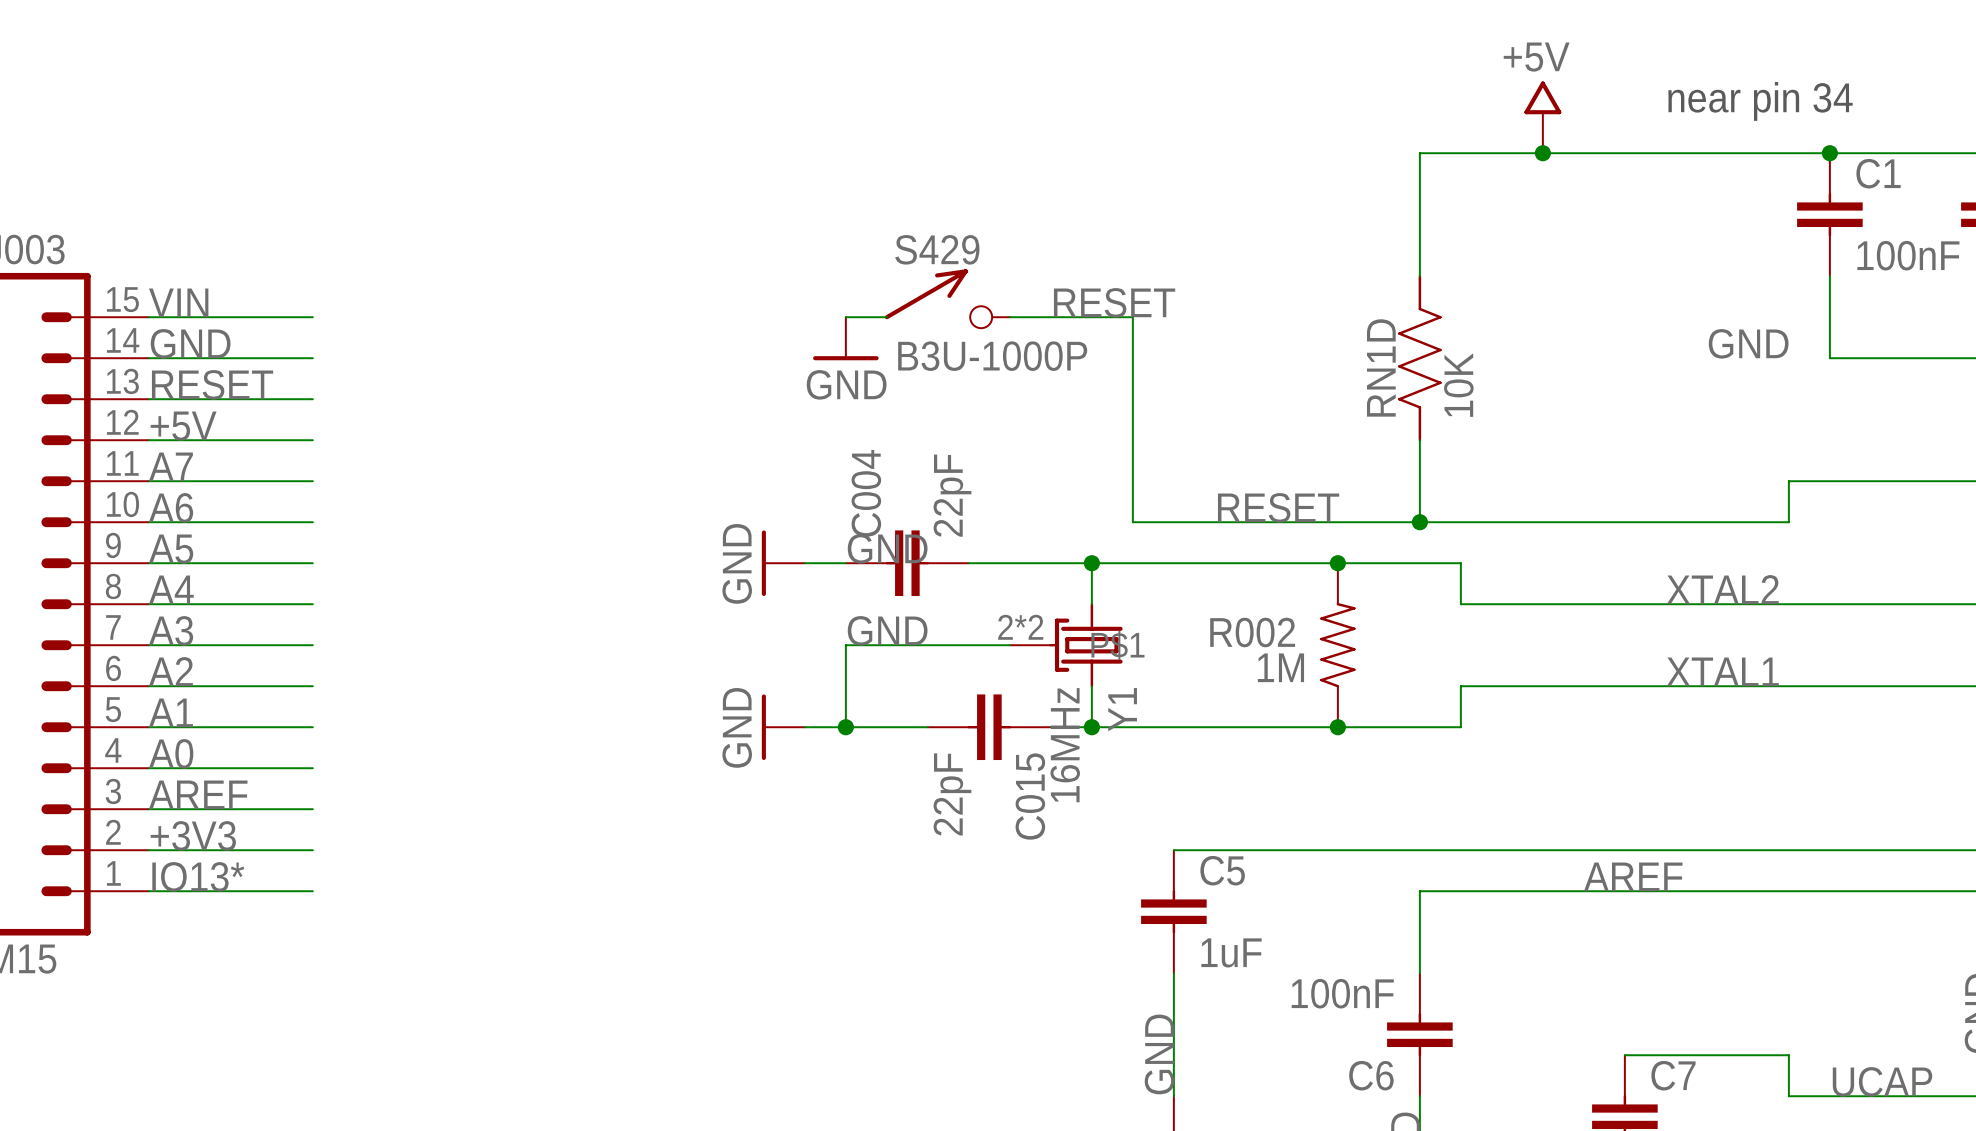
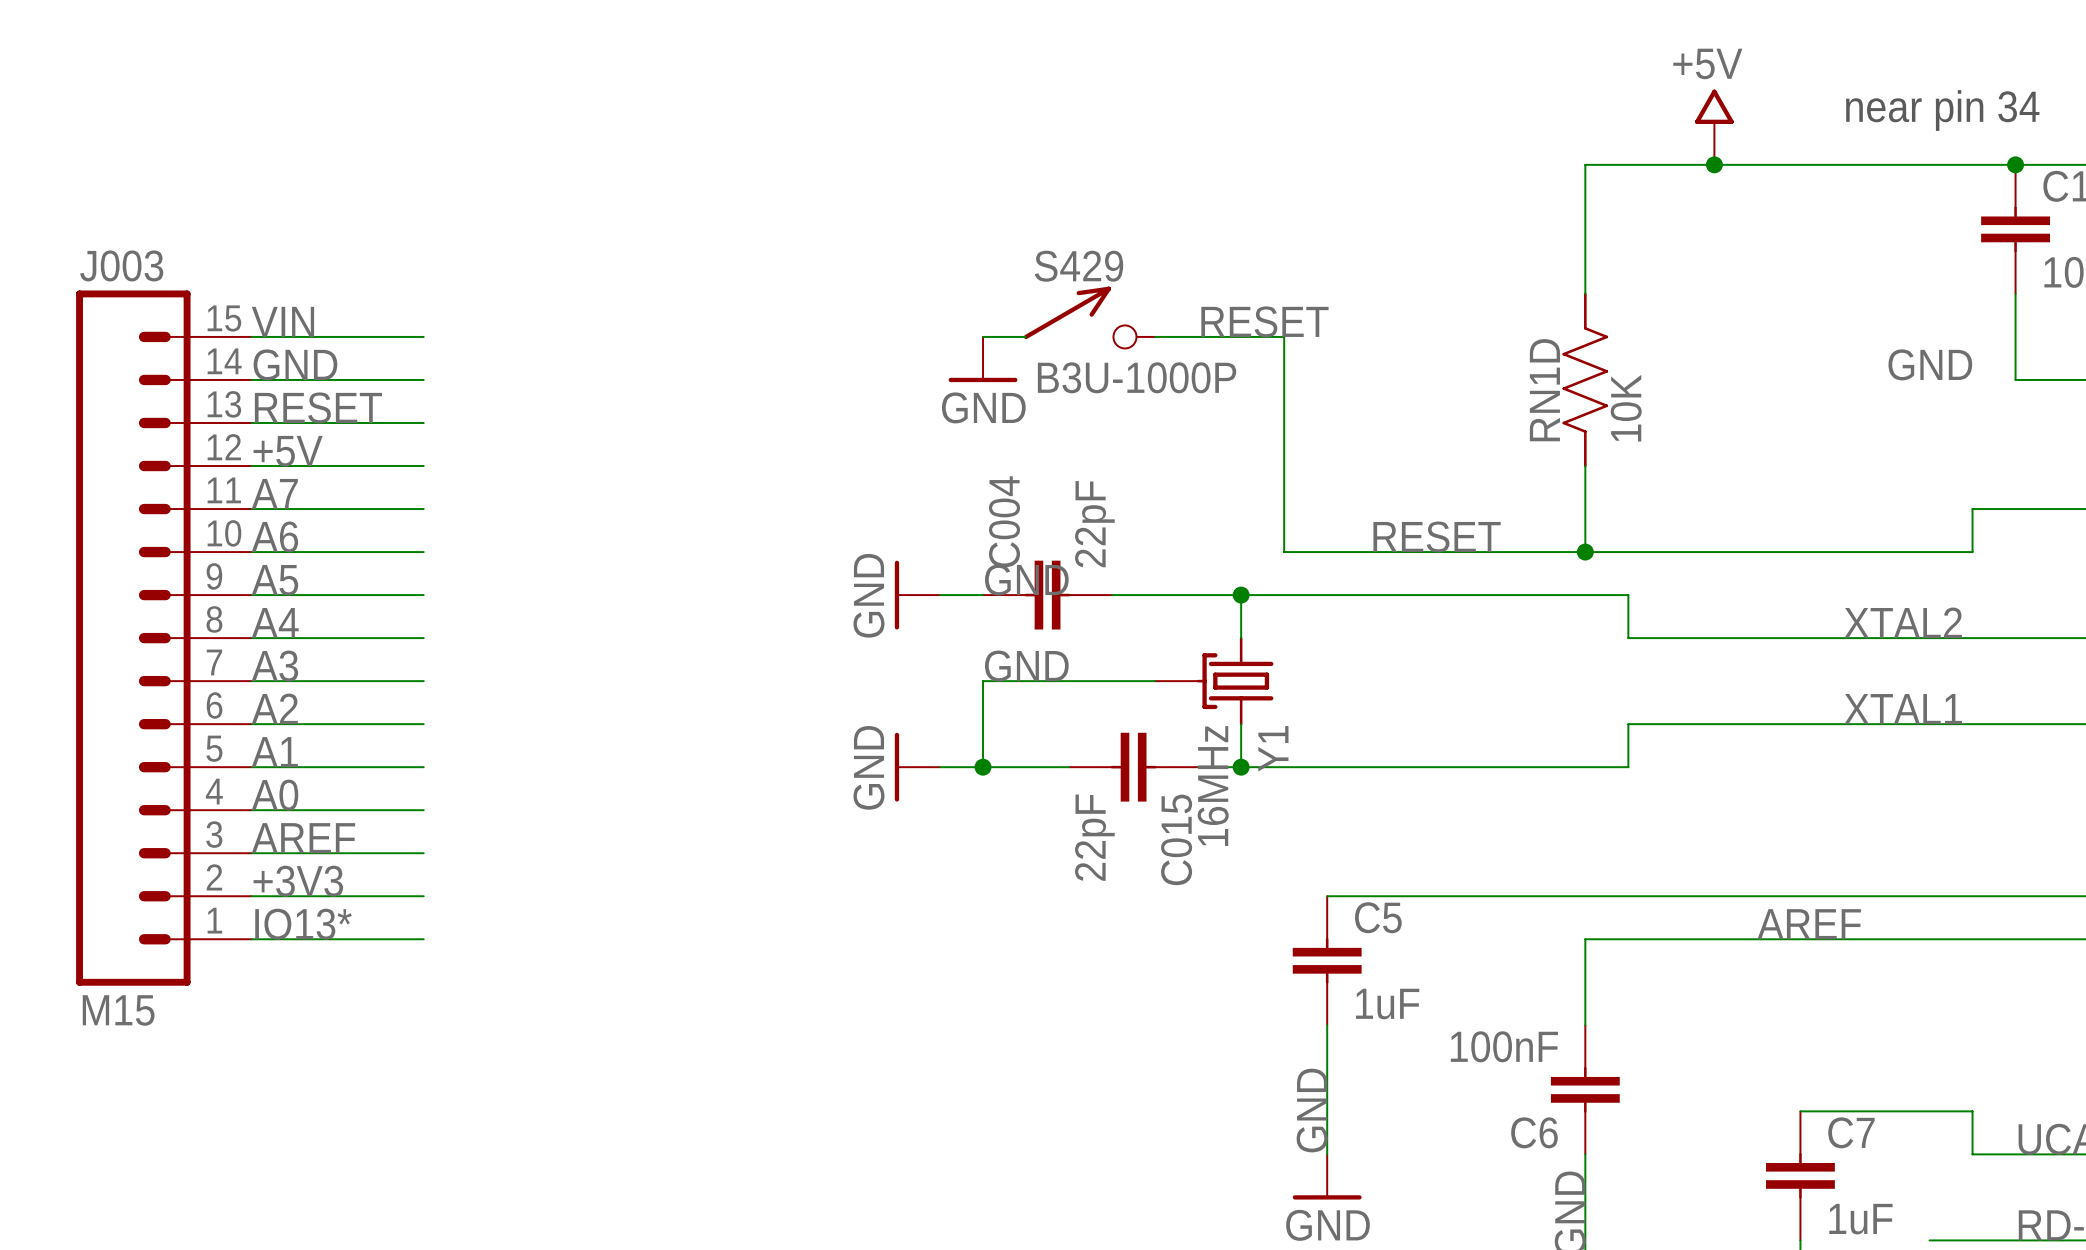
junction: (1337, 563) -> none
Y1 pin number: 2*2 (1020, 627) -> none
Y1 pin name: P$1 (1117, 645) -> none
R002: 1M (1337, 645) -> none
junction: (1337, 727) -> none

